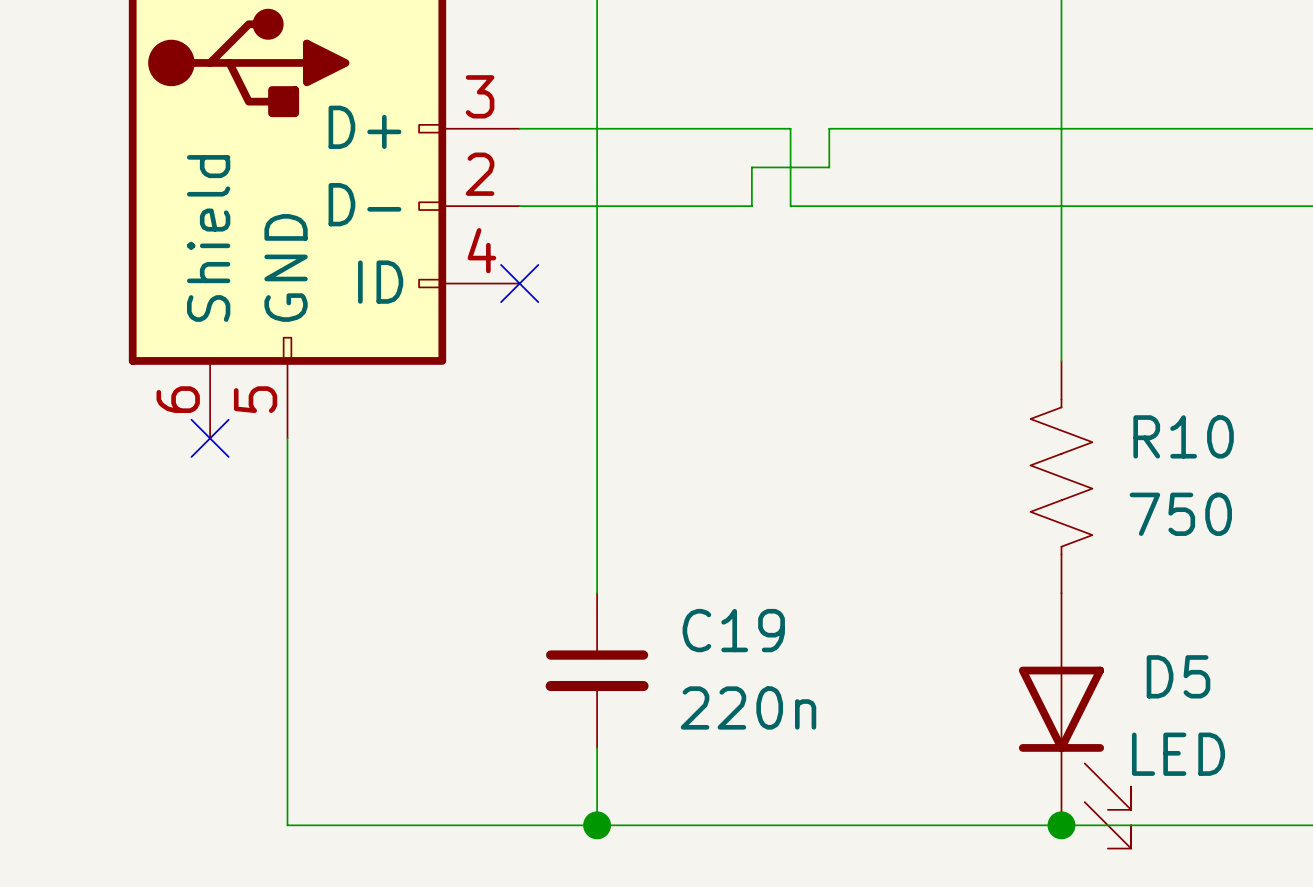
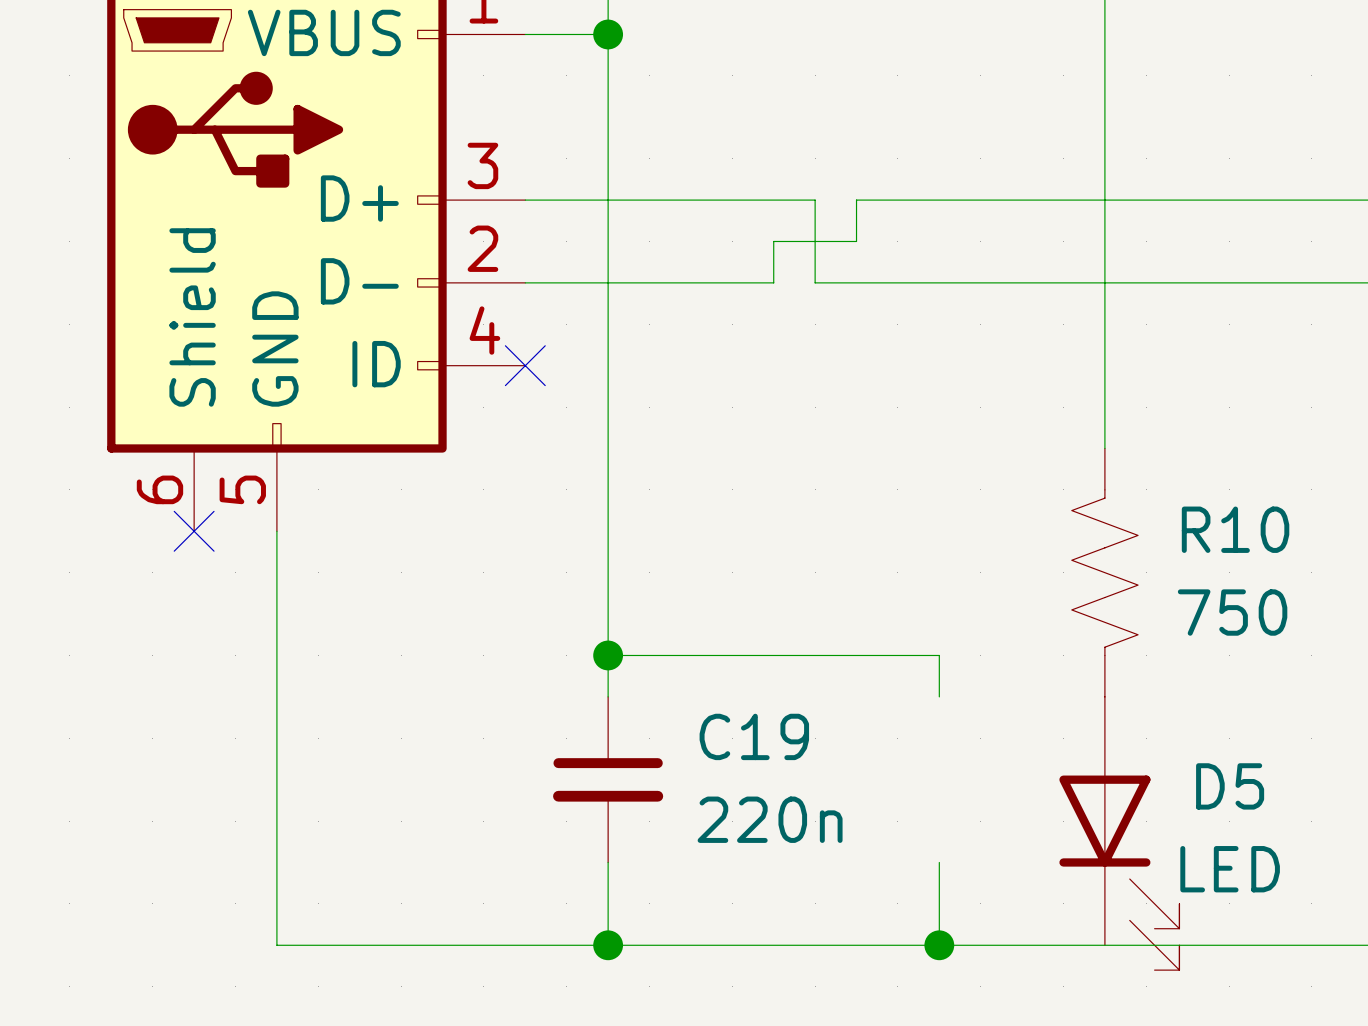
wire: none -> (608, 655) (939, 655) (939, 696)
junction: none -> (608, 655)
wire: none -> (939, 862) (939, 945)
junction position: (1061, 825) -> (939, 945)

